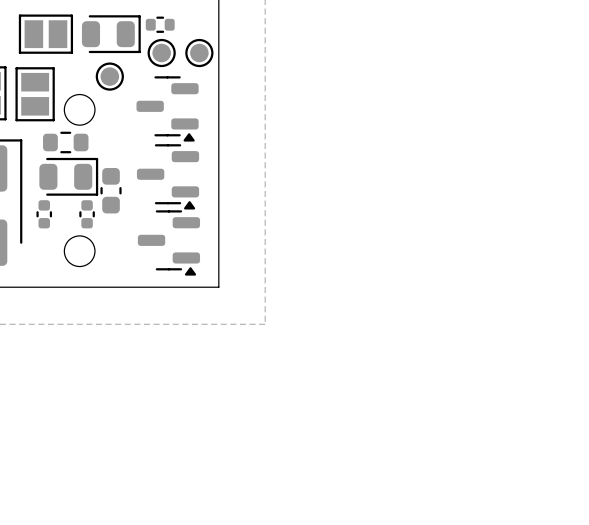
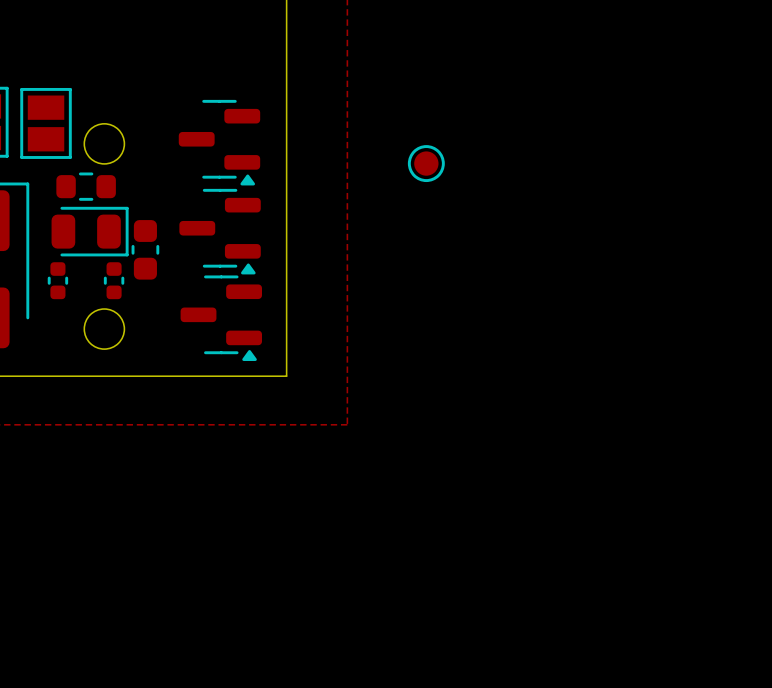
part: (160, 24) -> none
part: (45, 34) -> none
part: (111, 34) -> none
part: (161, 53) -> none
part: (199, 53) -> none
part: (109, 76) -> none
part: none -> (426, 163)

